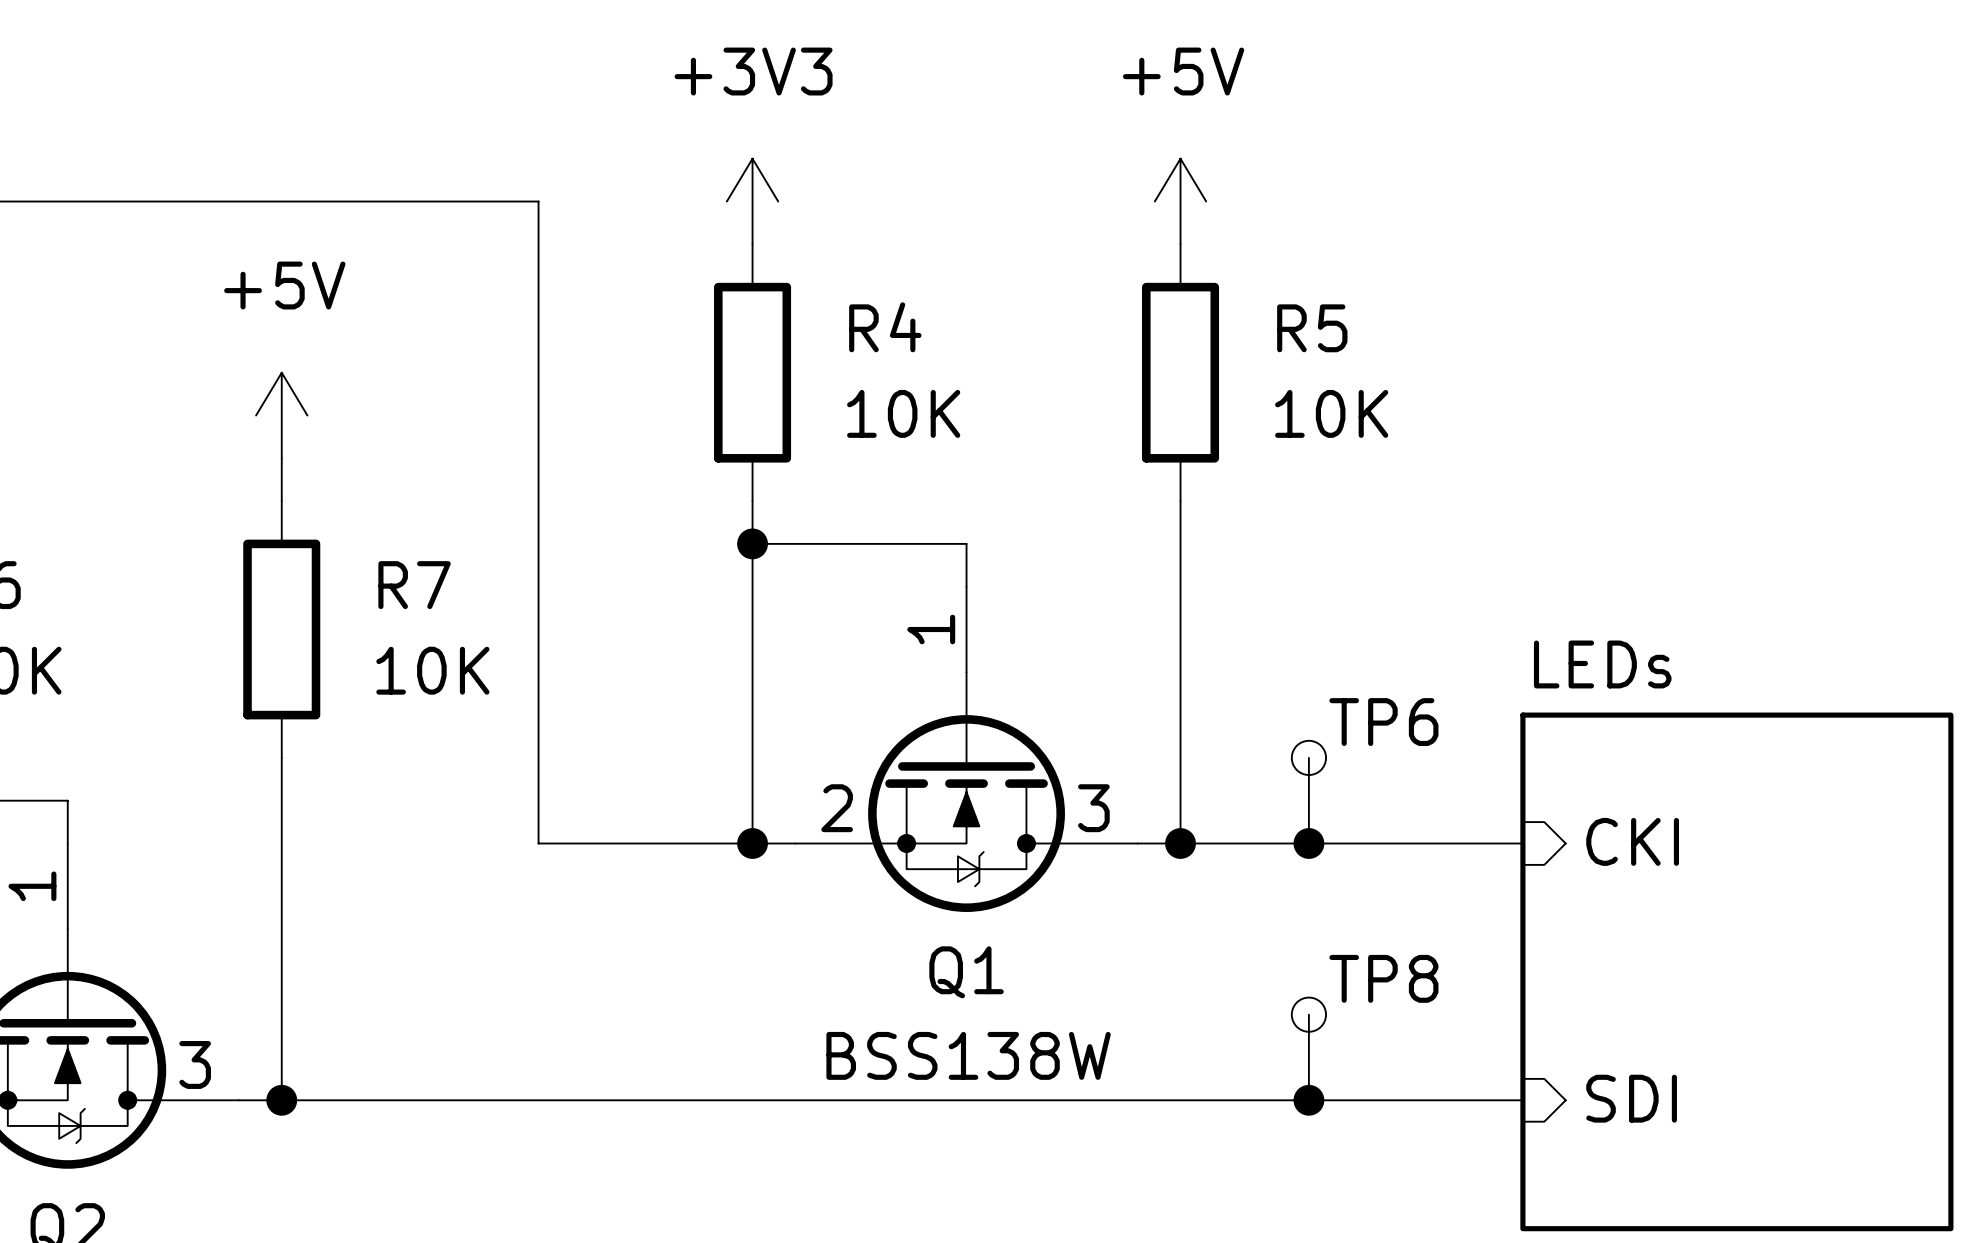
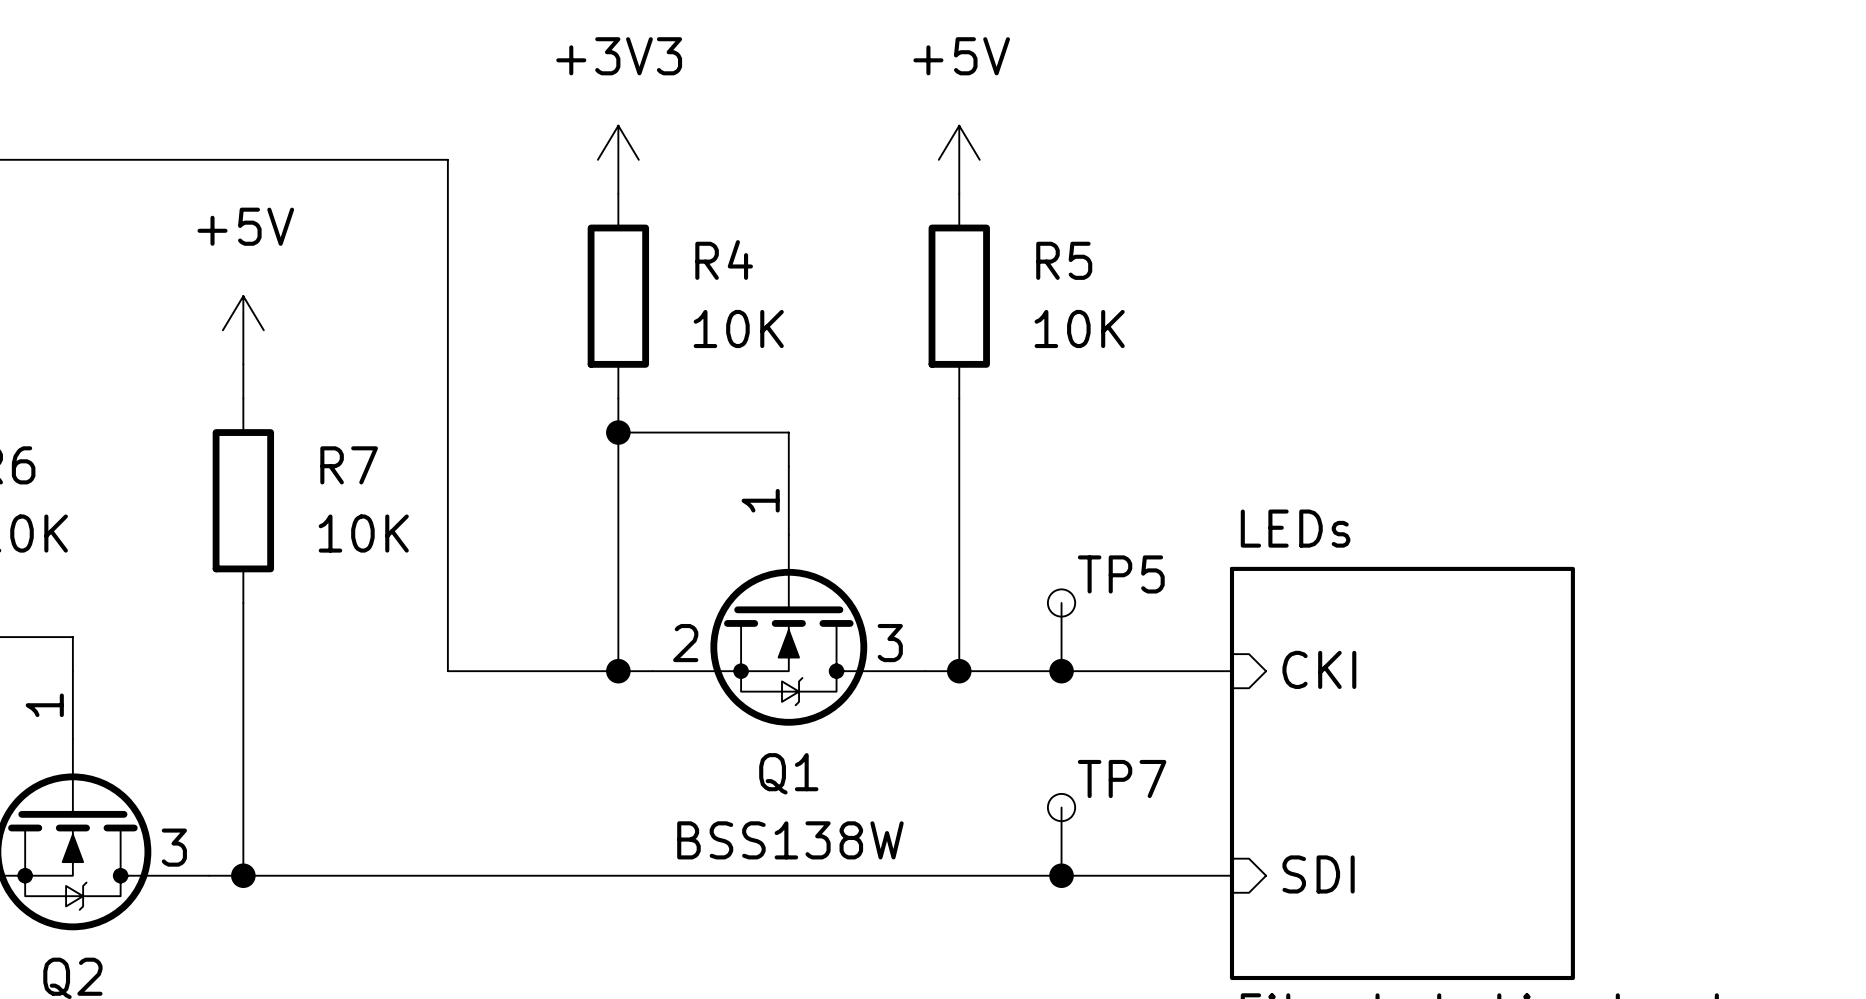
TP6 name: TP6 (1383, 722) -> TP5 (1121, 574)
TP8 name: TP8 (1383, 978) -> TP7 (1122, 779)

